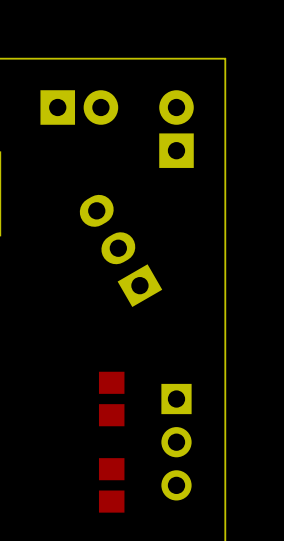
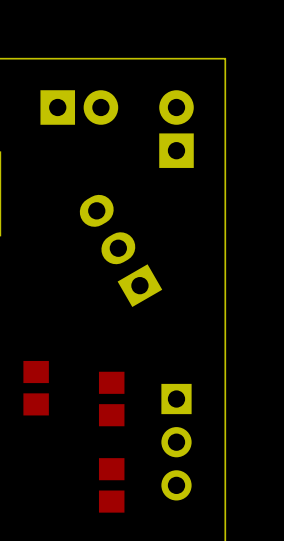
part: none -> (36, 388)

